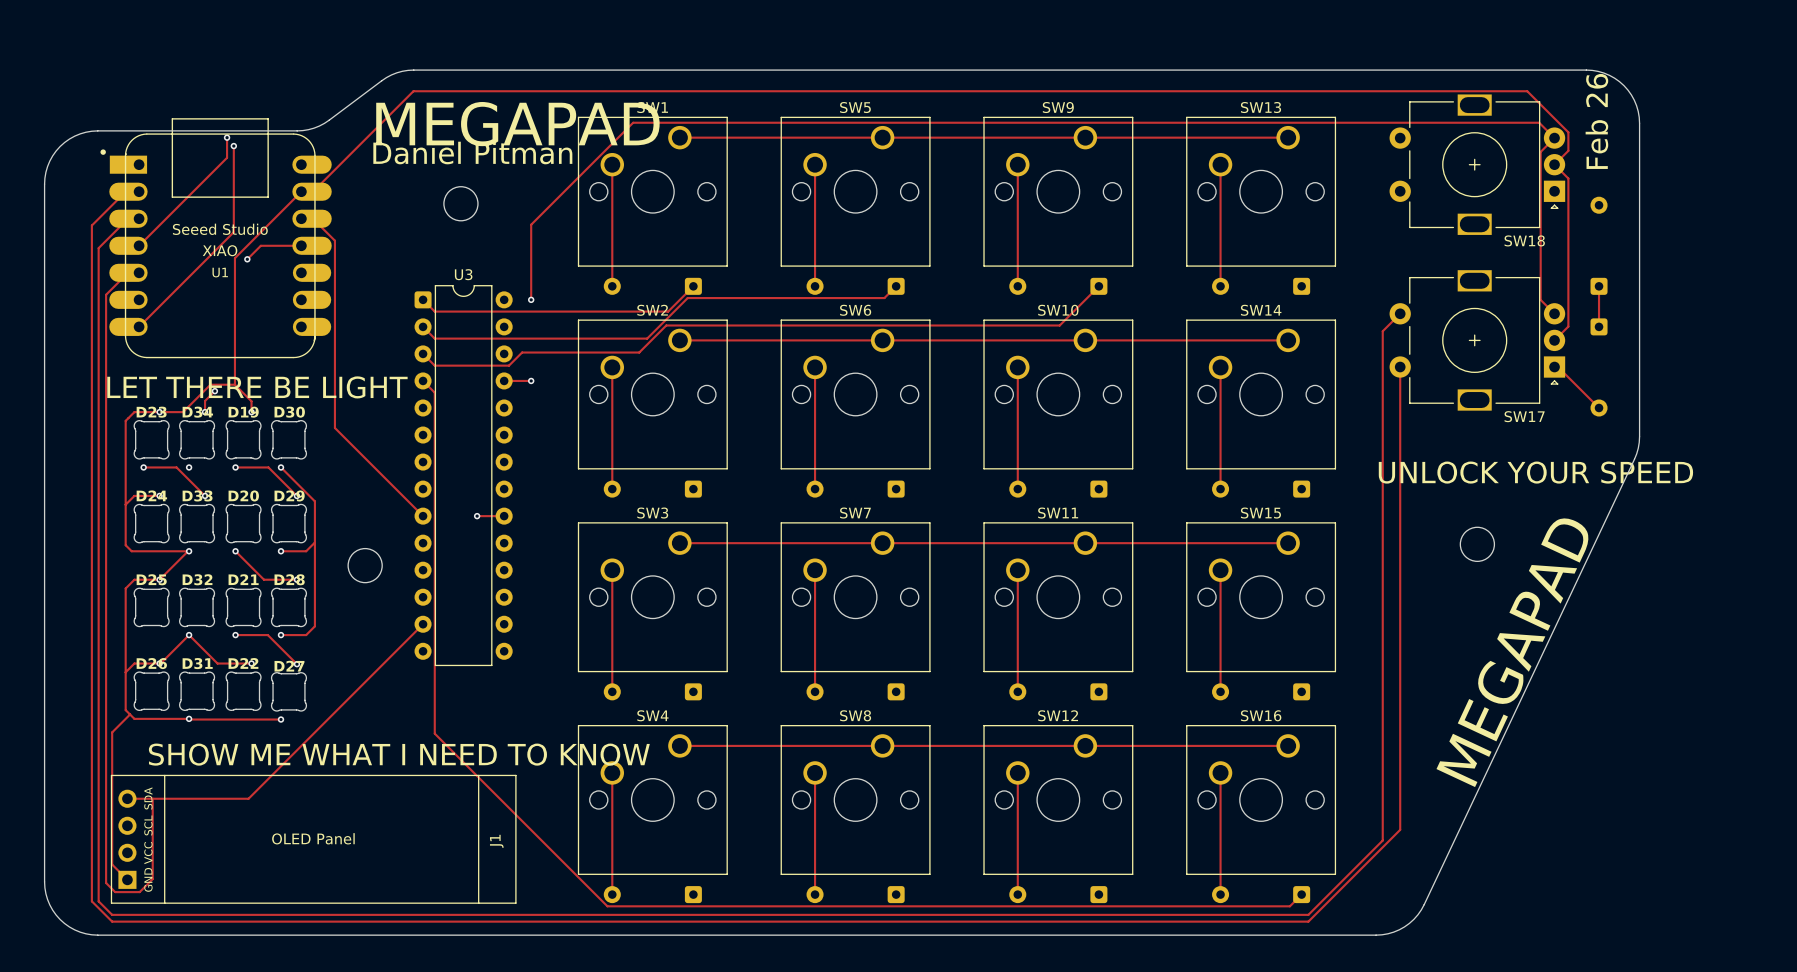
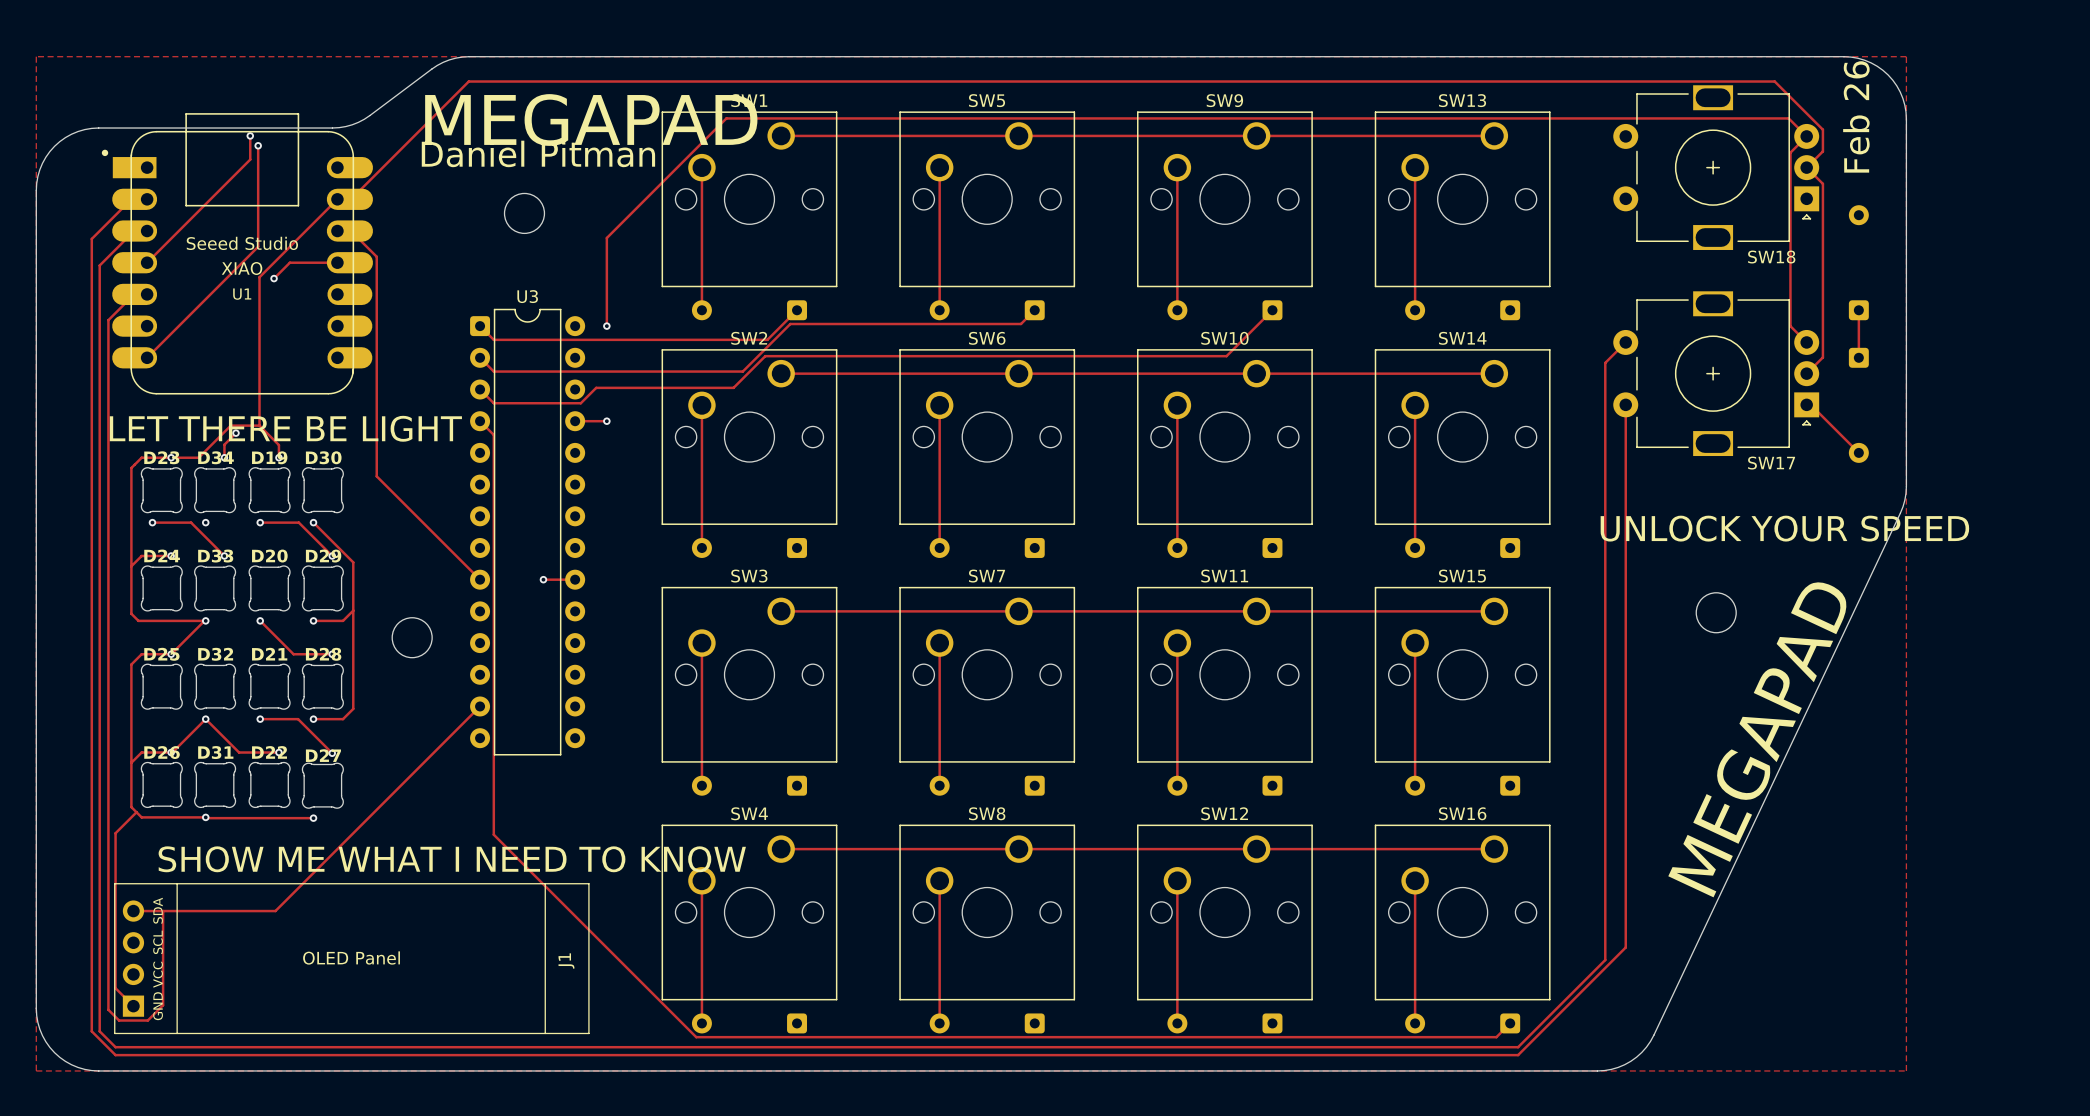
zone outline: none -> (36, 56) (1906, 56) (1906, 1070) (36, 1070) (36, 56)

